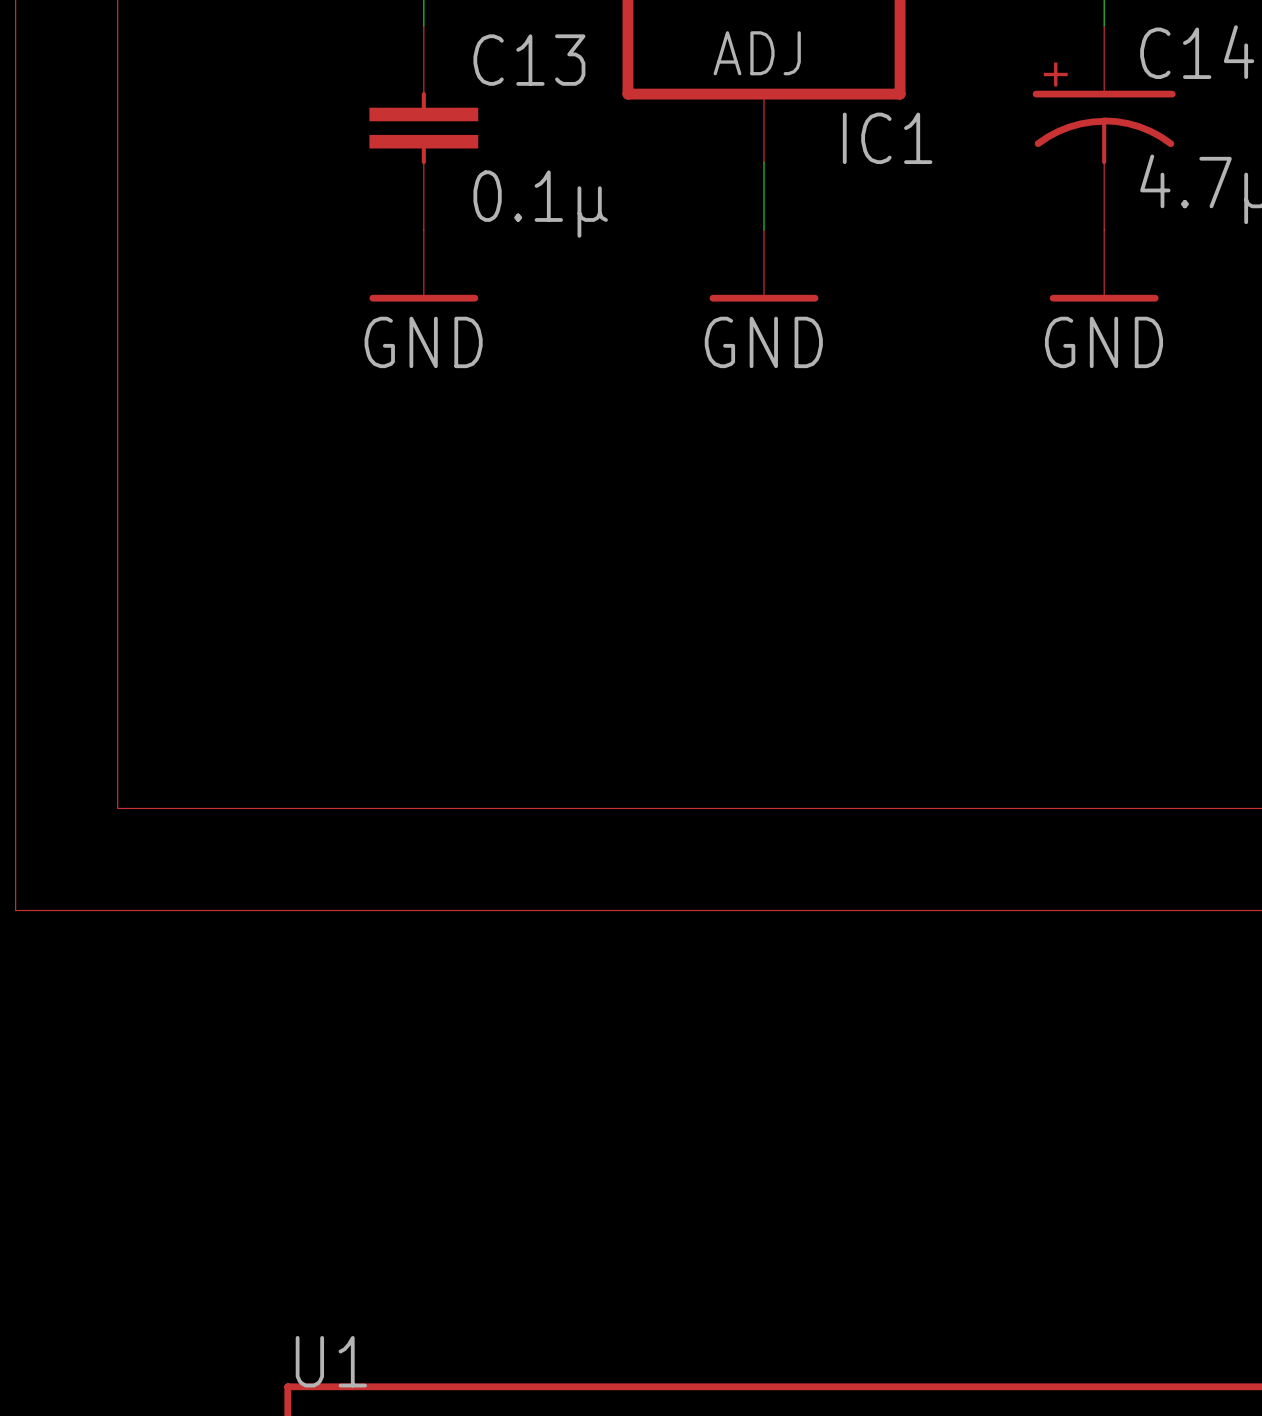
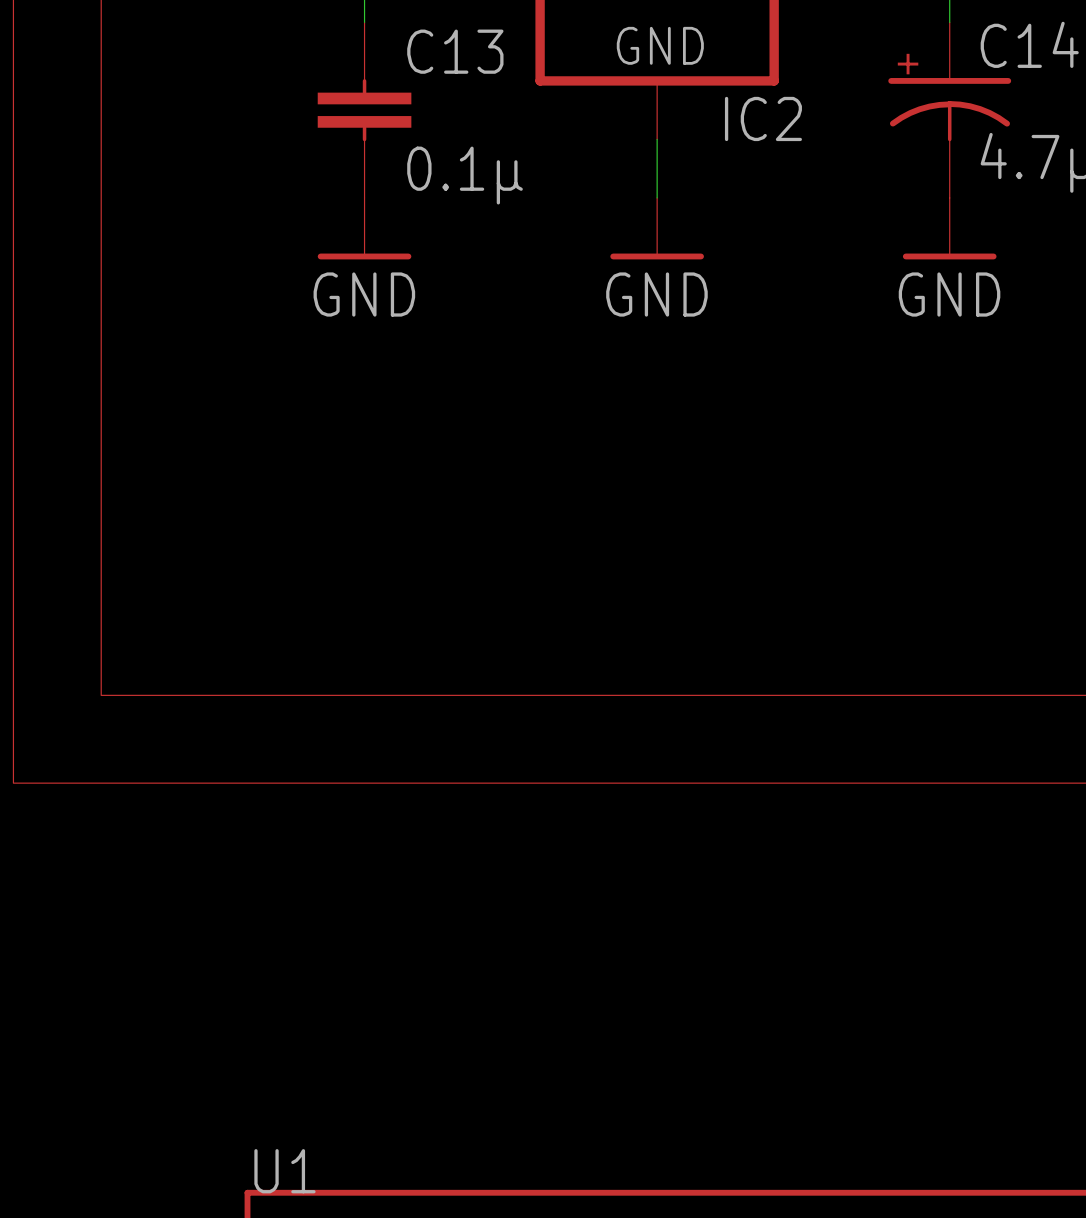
IC1 text: ADJ (757, 53) -> GND (660, 45)
IC1 name: IC1 (887, 138) -> IC2 (763, 118)

